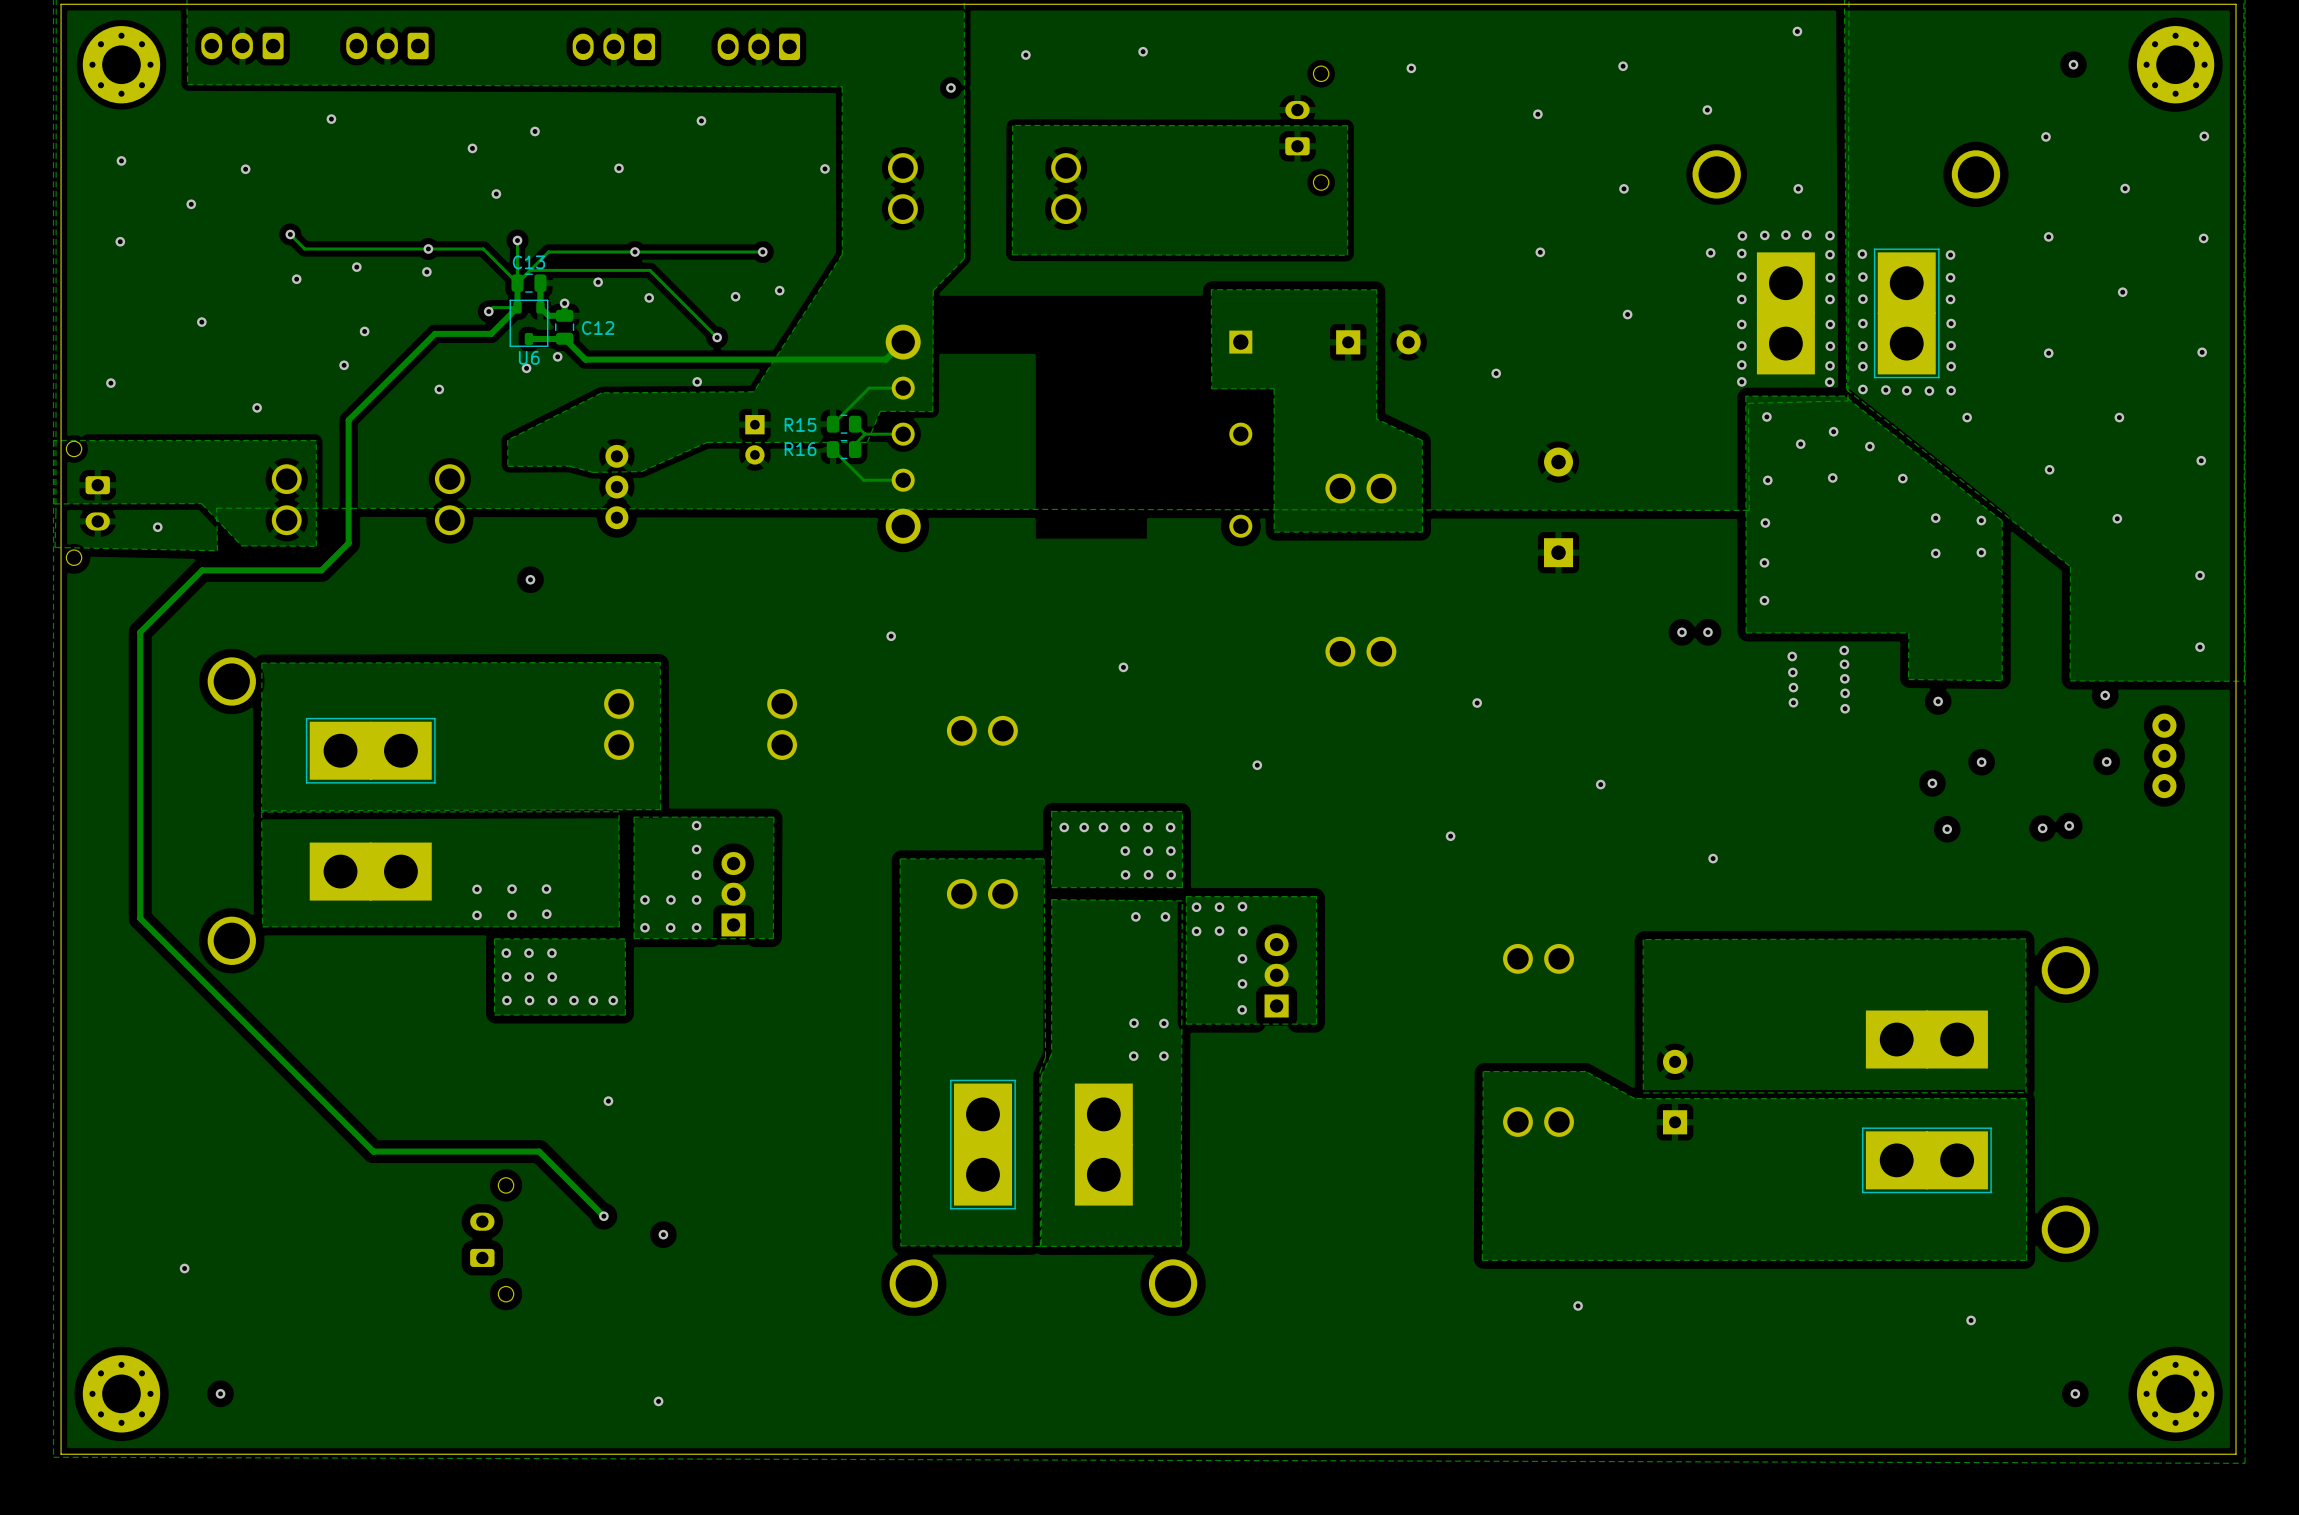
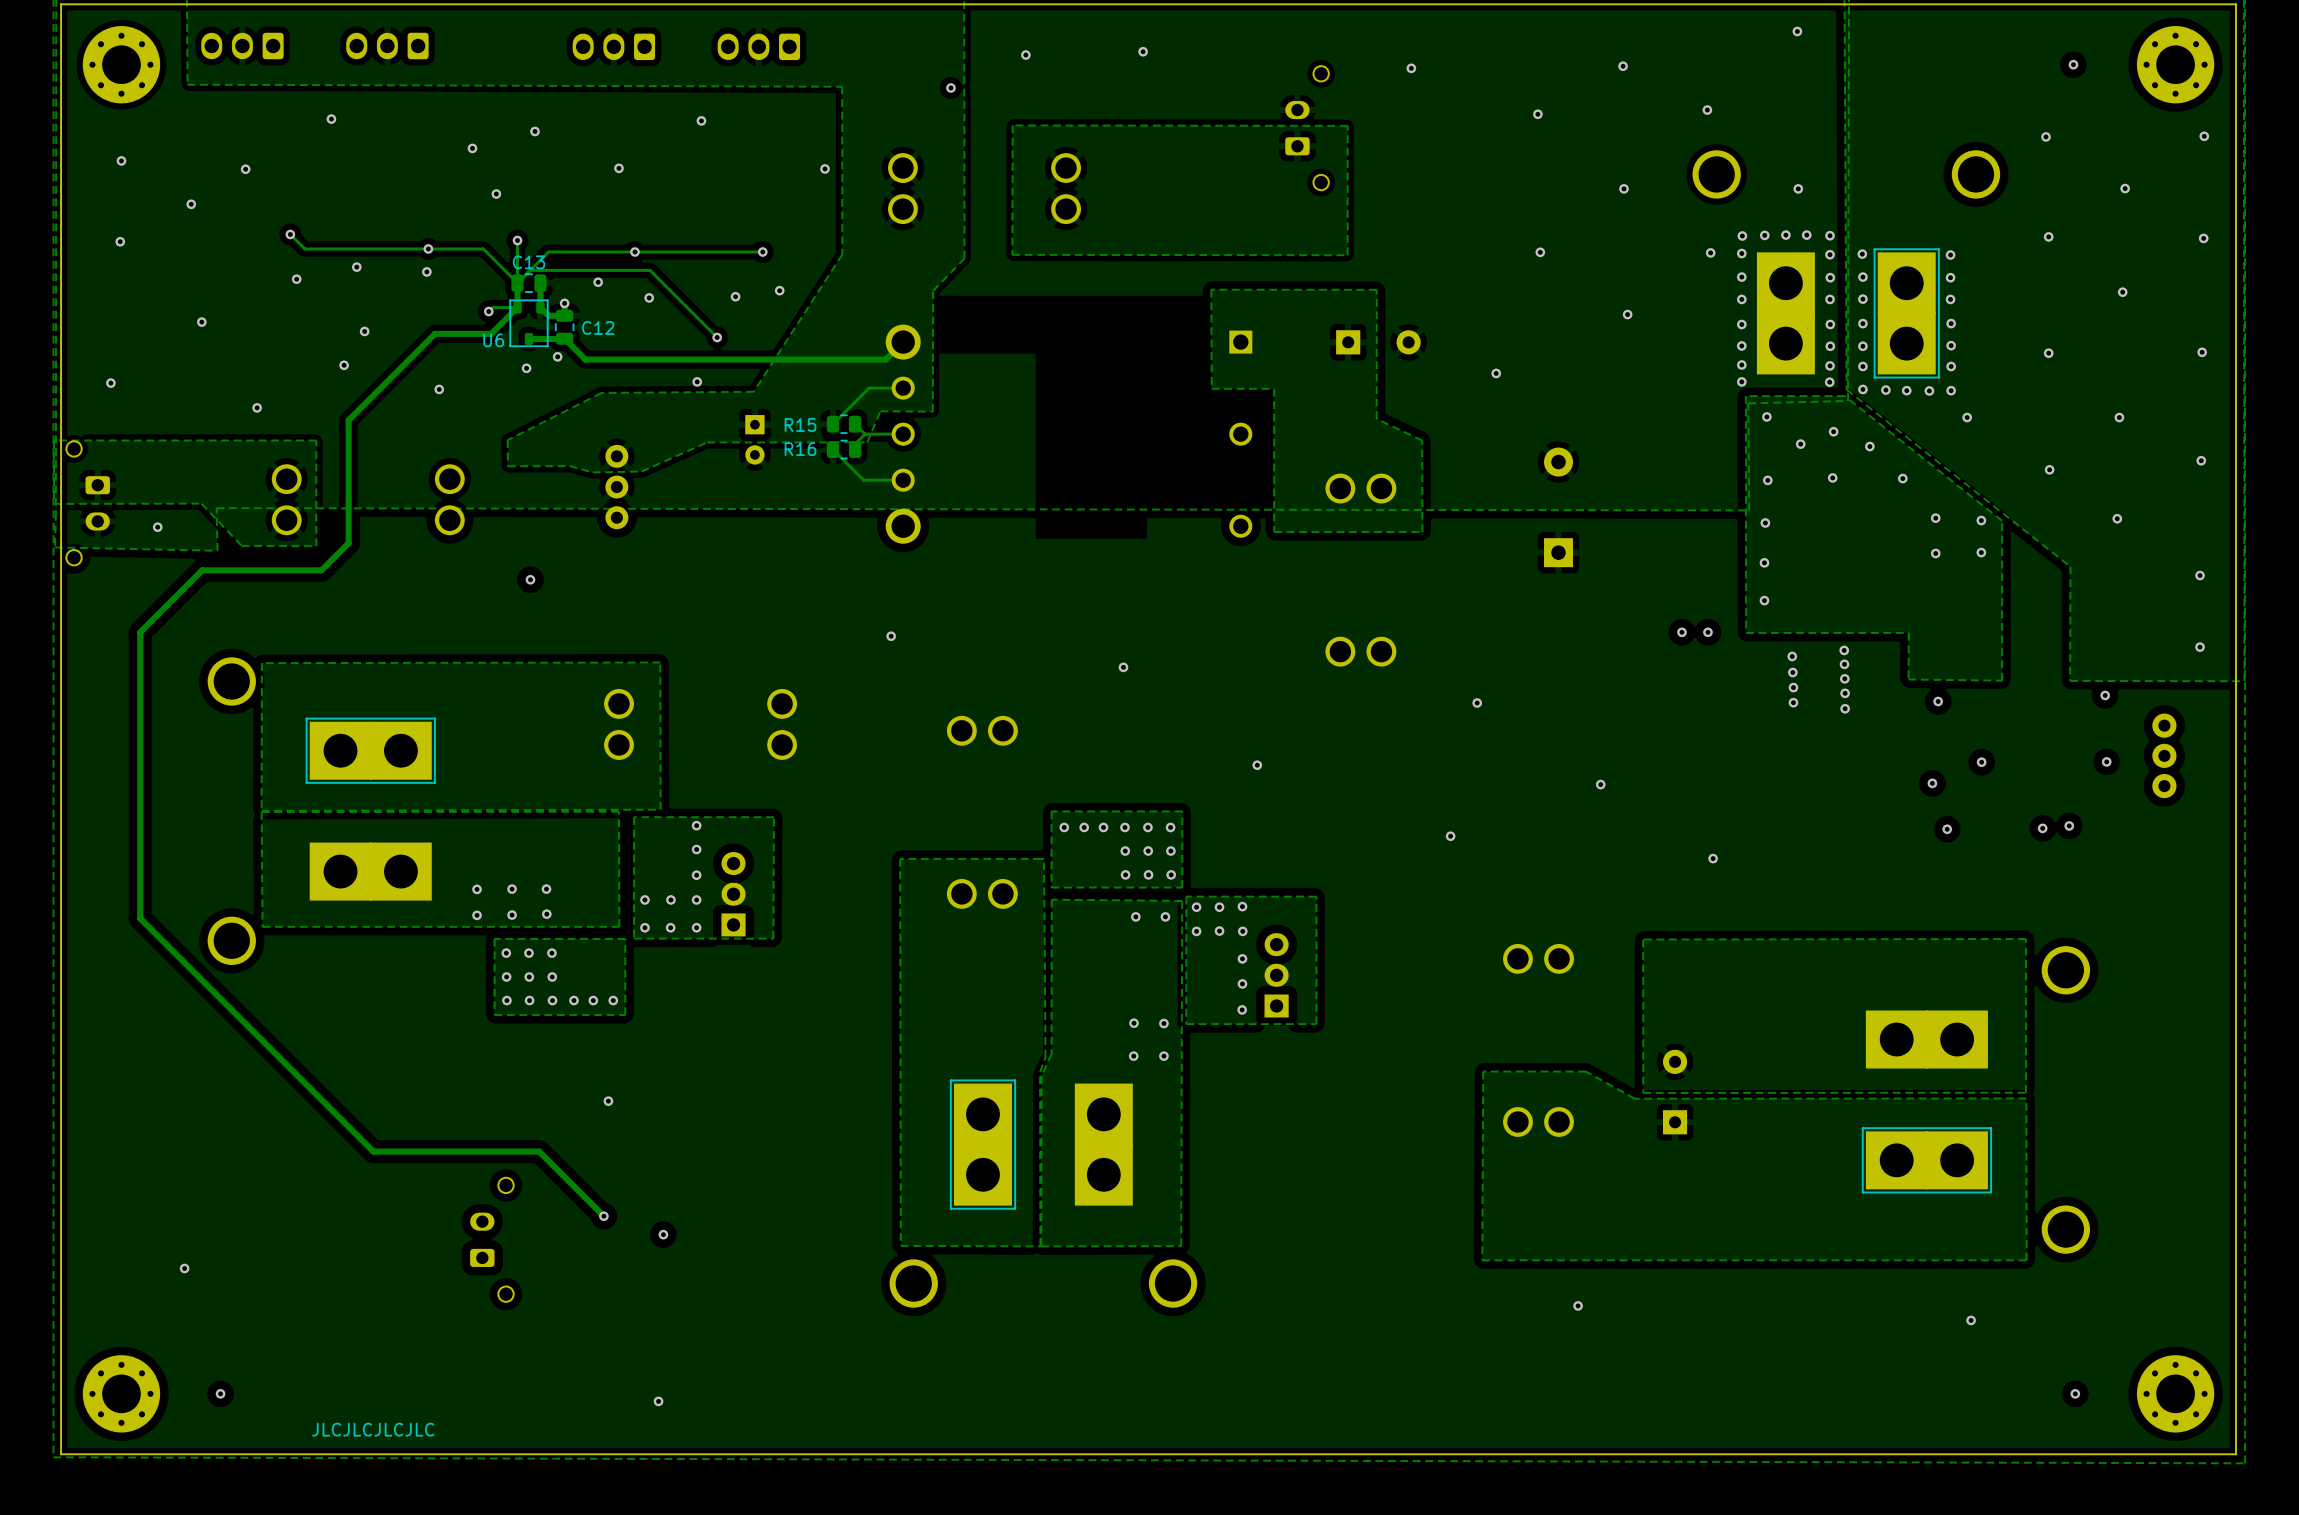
U6 name position: U6 (529, 357) -> U6 (493, 340)
text: none -> JLCJLCJLCJLC (373, 1429)

